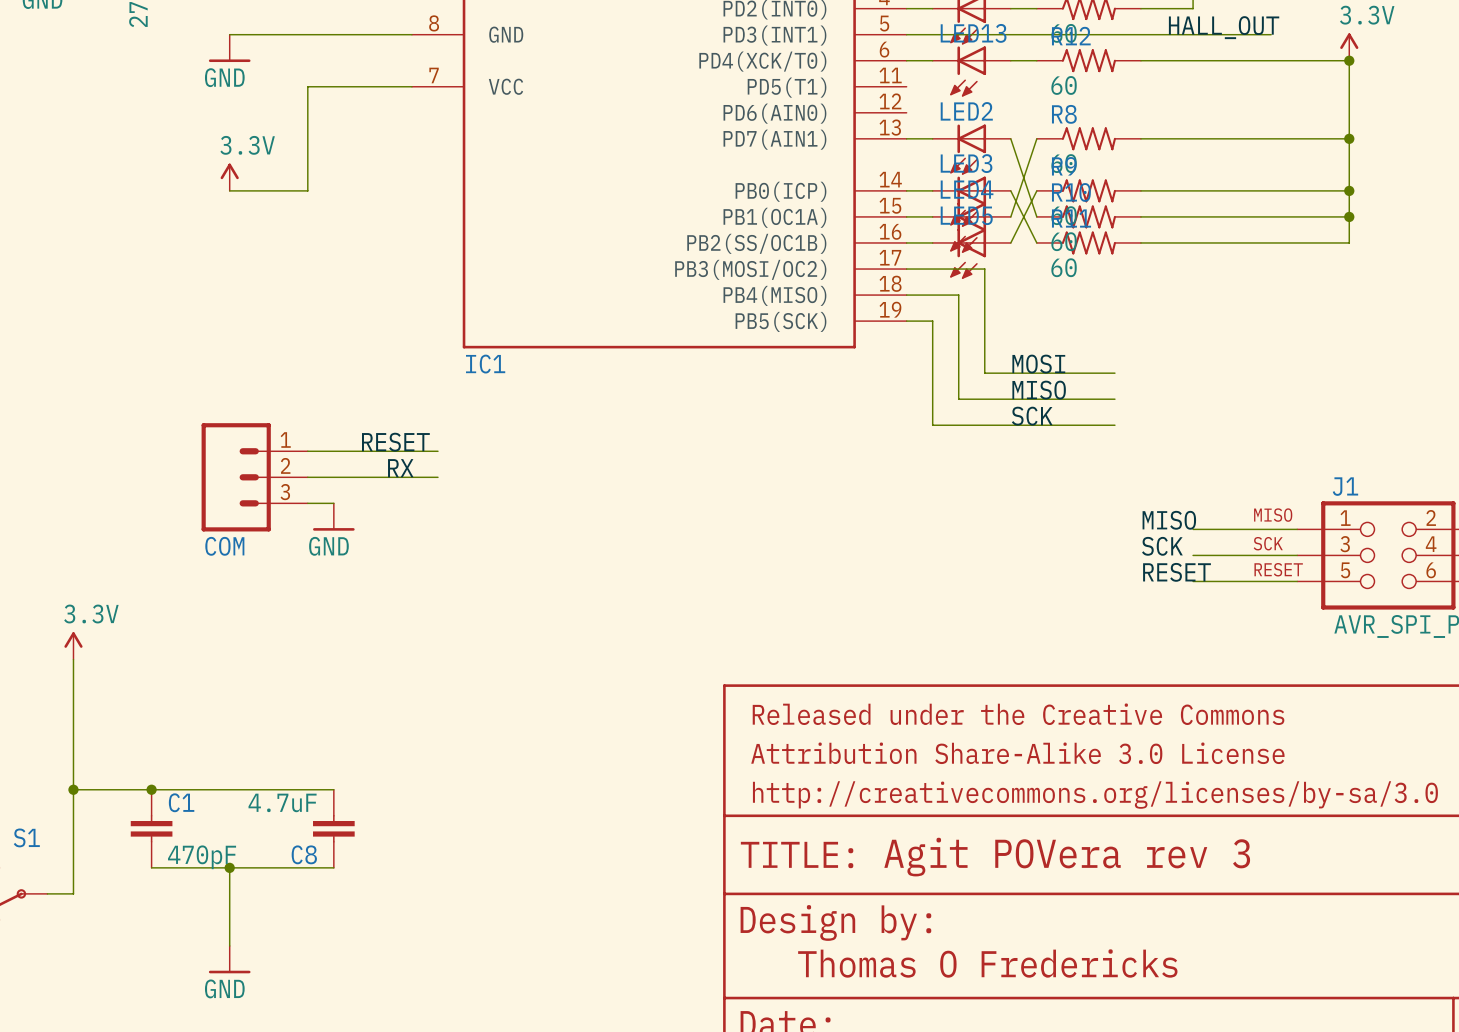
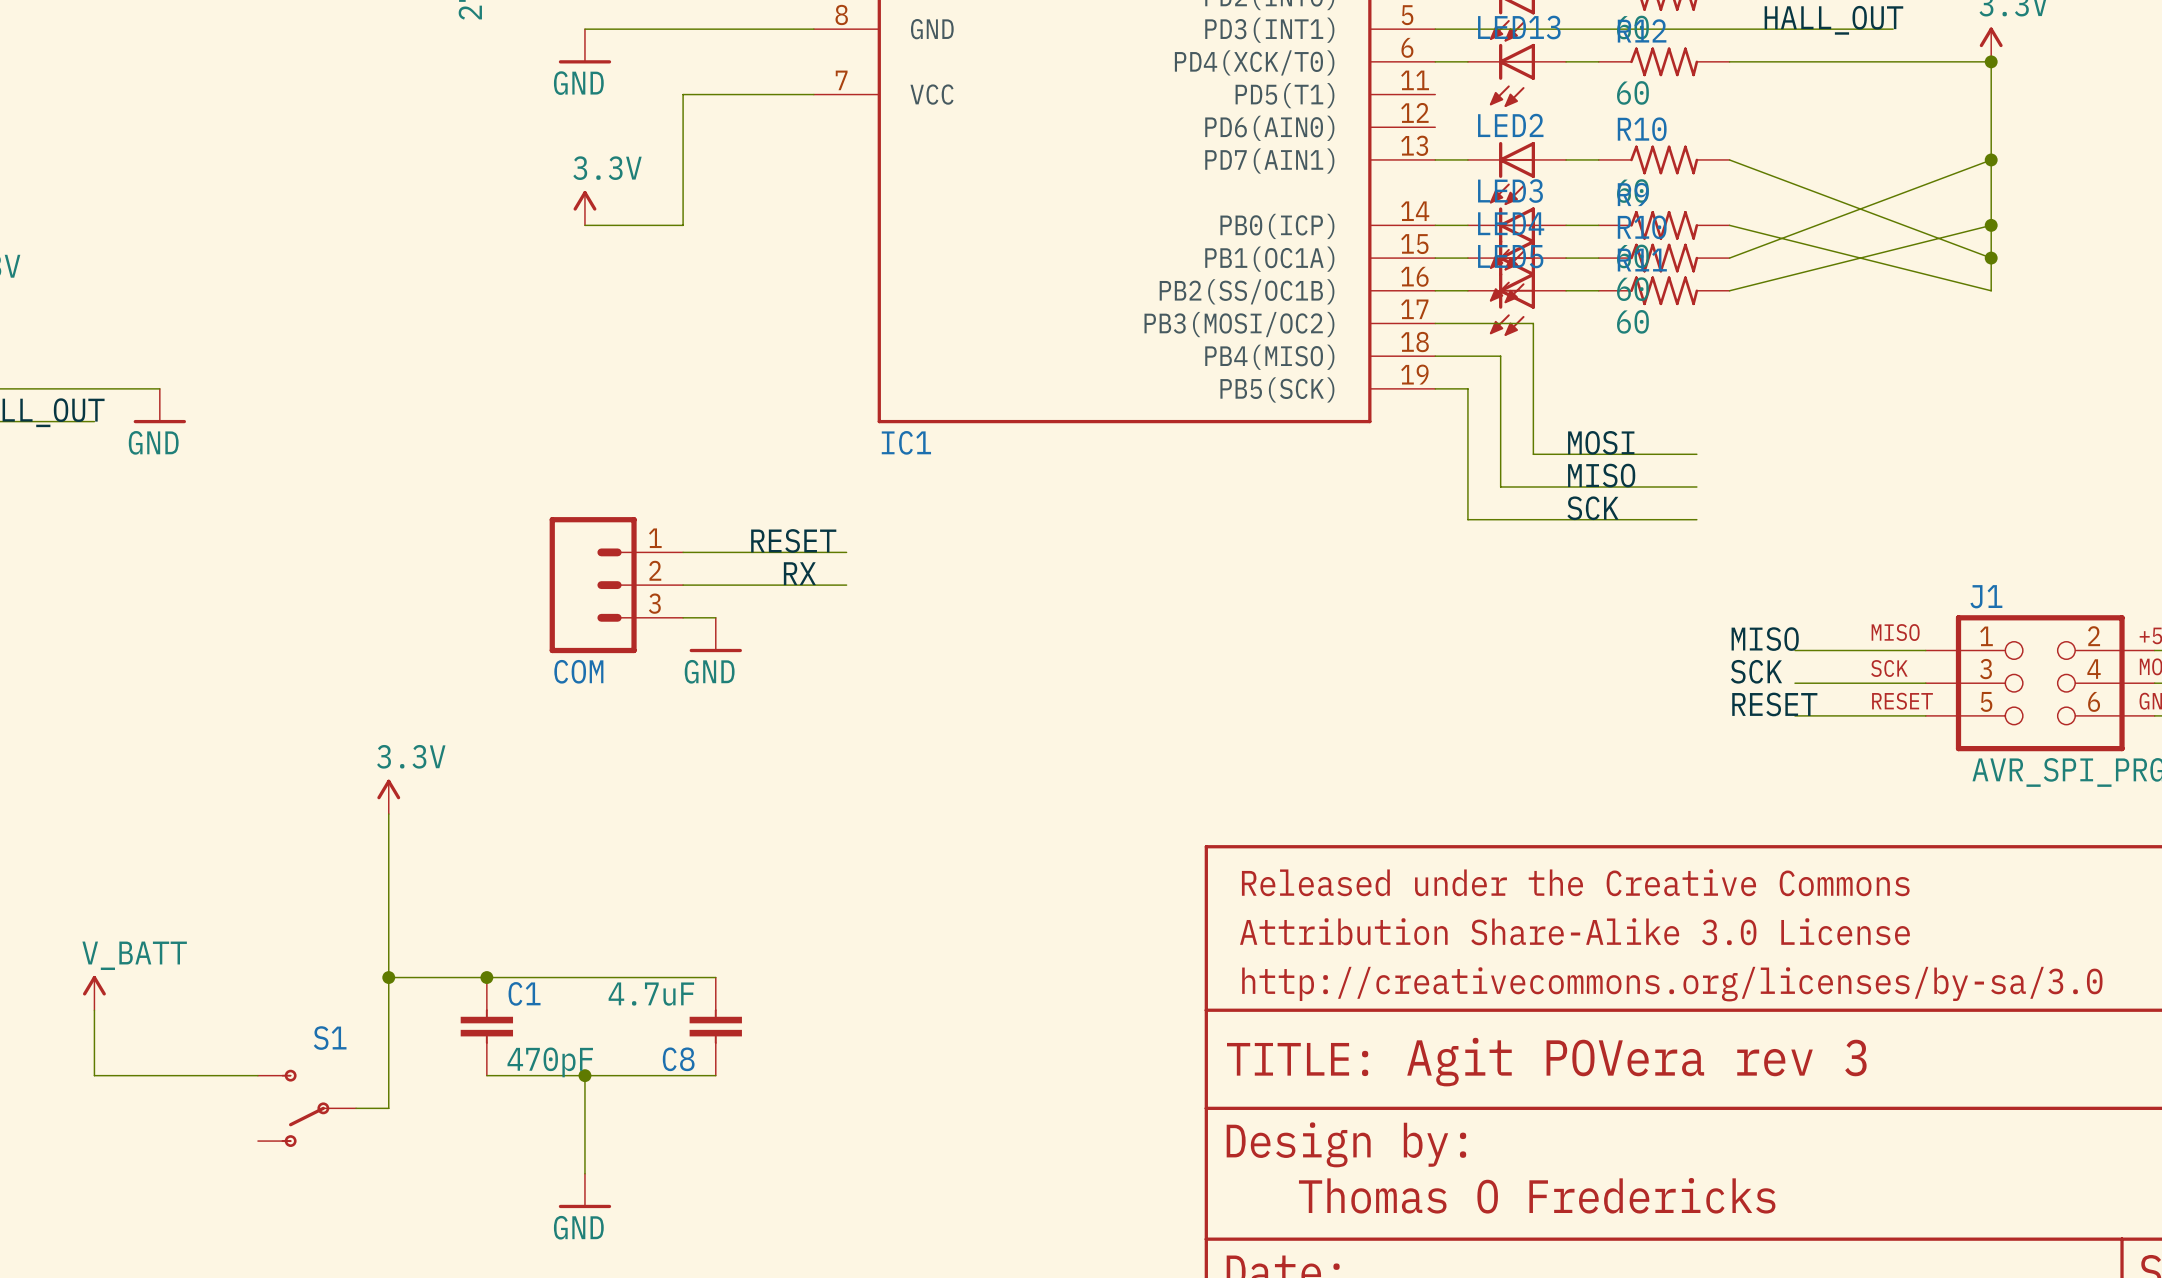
R8 name: R8 (1064, 114) -> R10 (1642, 129)
wire: (1010, 138) (1036, 216) -> (1566, 159) (1598, 159)
wire: (1036, 138) (1010, 216) -> (1598, 258) (1566, 258)
wire: (1140, 138) (1349, 138) -> (1729, 159) (1991, 258)
wire: (1010, 190) (1036, 242) -> (1566, 225) (1598, 225)
wire: (1036, 190) (1010, 242) -> (1598, 290) (1566, 290)
wire: (1140, 190) (1349, 190) -> (1729, 225) (1991, 290)
wire: (1140, 216) (1349, 216) -> (1729, 258) (1991, 159)
wire: (1140, 242) (1349, 242) -> (1729, 290) (1991, 225)

